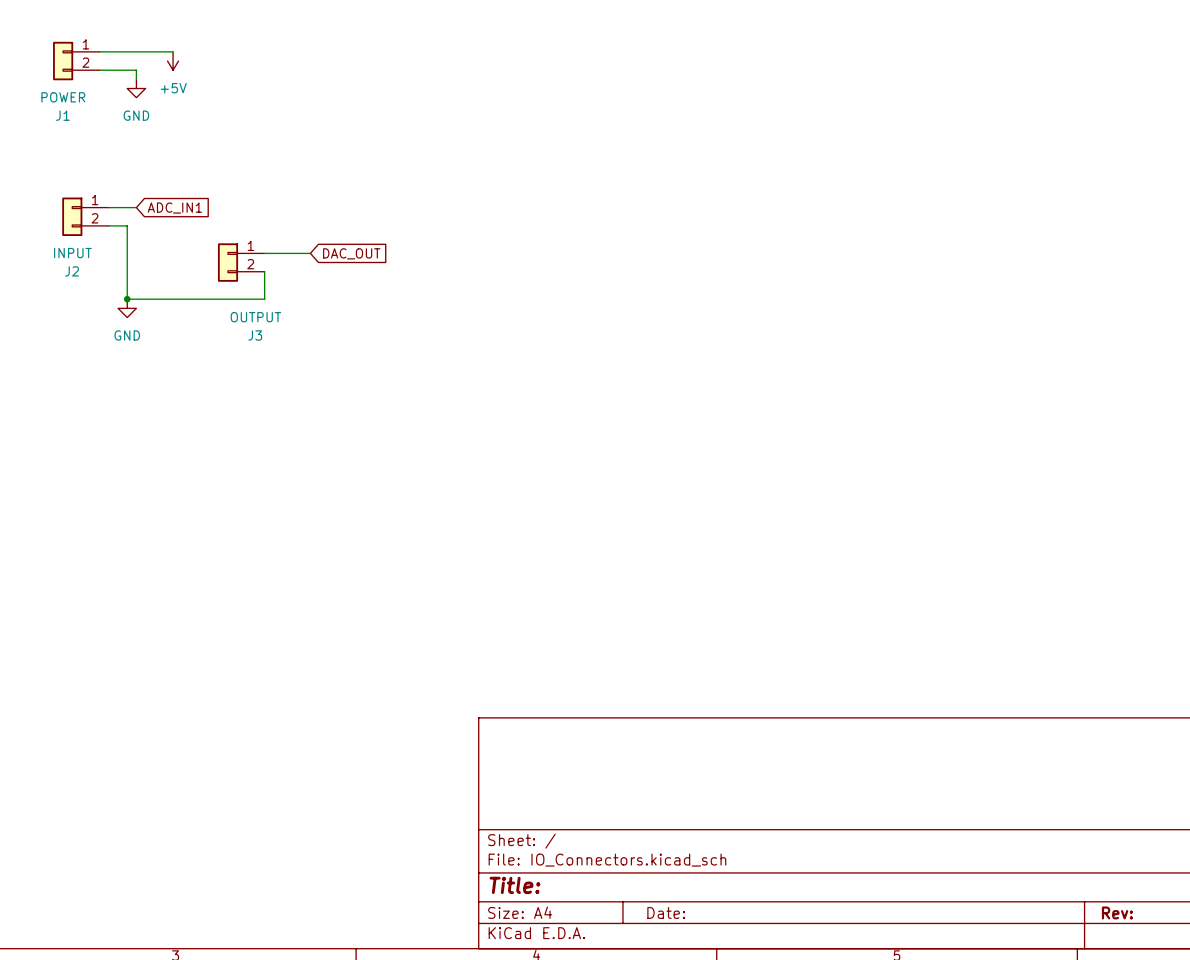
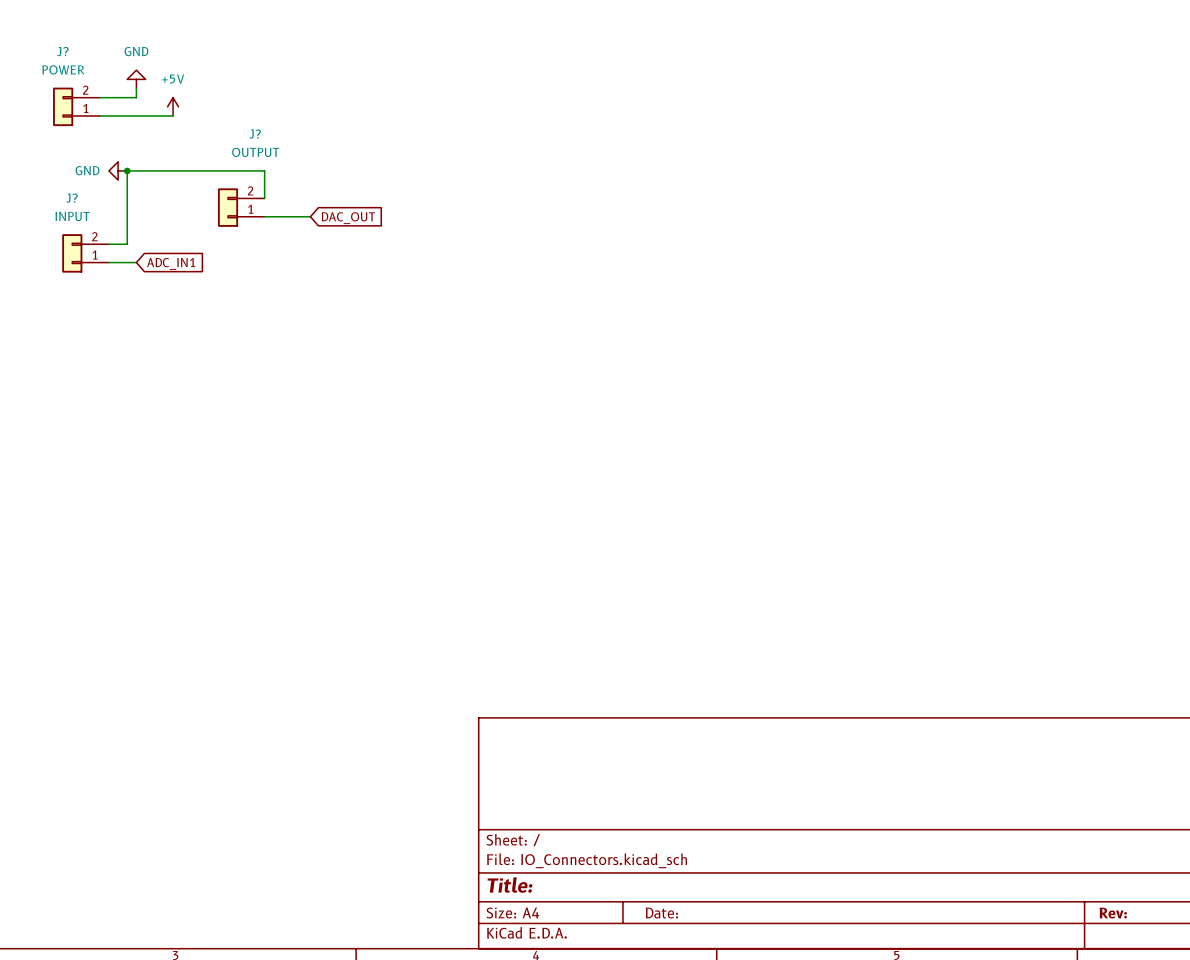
wire: (99, 51) (173, 51) -> (99, 116) (173, 116)
J1: POWER (76, 61) -> none
power symbol rotation: 0° (173, 61) -> 180° (173, 106)
power symbol position: +5V (173, 61) -> +5V (173, 106)
wire: (99, 70) (136, 70) (136, 79) -> none
wire: none -> (136, 88) (136, 97) (99, 97)
power symbol rotation: 0° (136, 88) -> 180° (136, 79)
J?: none -> POWER (76, 106)
power symbol: none -> GND (118, 170)
junction: none -> (127, 170)
wire: (108, 207) (136, 207) -> (108, 262) (136, 262)
J?: none -> OUTPUT (241, 207)
global label position: ADC_IN1 (174, 208) -> ADC_IN1 (171, 263)
J2: INPUT (85, 216) -> none
wire: (108, 225) (127, 225) -> (264, 198) (264, 170) (127, 170) (127, 225)
wire: (127, 244) (127, 299) (264, 299) (264, 271) -> (127, 244) (108, 244)
J?: none -> INPUT (85, 253)
wire: (264, 253) (310, 253) -> (264, 216) (310, 216)
global label position: DAC_OUT (351, 253) -> DAC_OUT (348, 218)
J3: OUTPUT (241, 262) -> none
junction: (127, 299) -> none
power symbol: GND (127, 308) -> none

